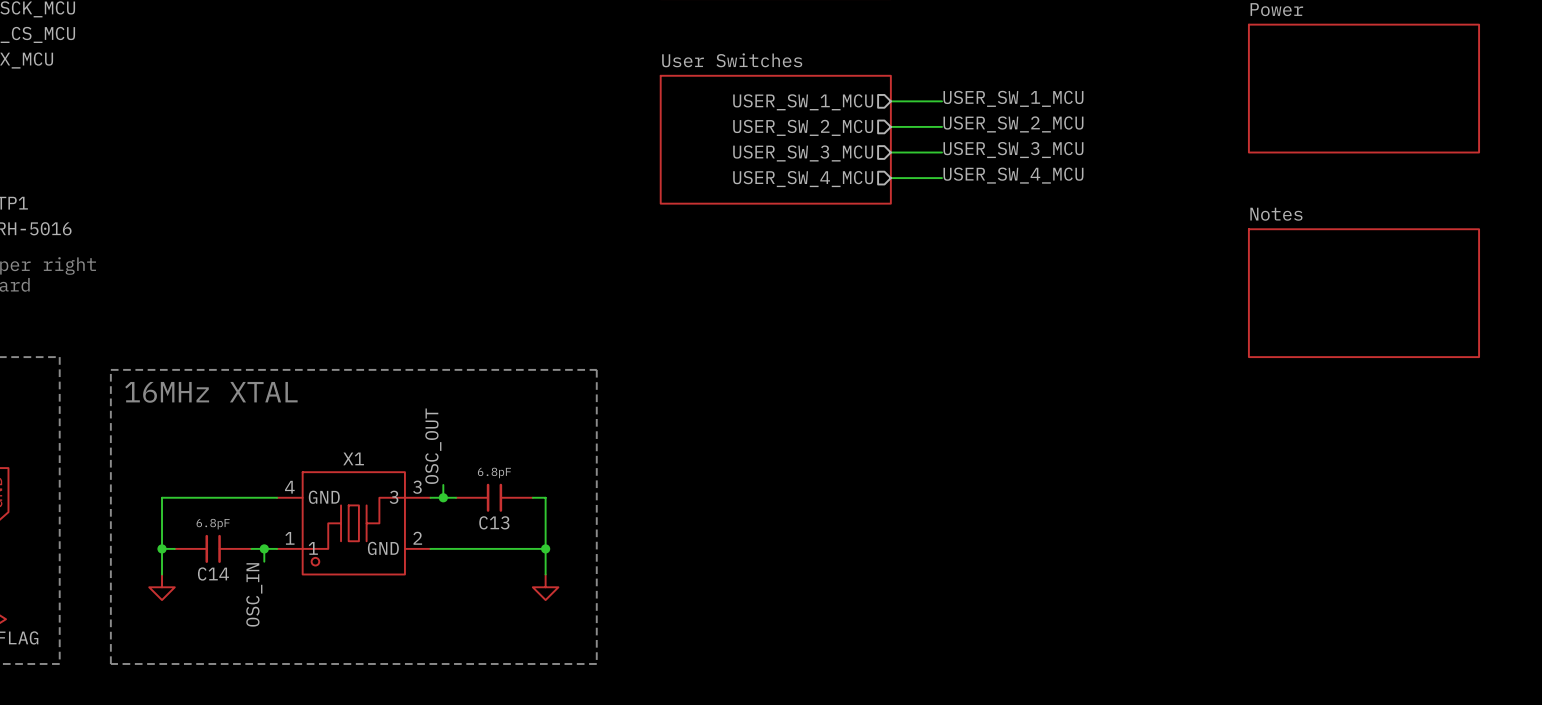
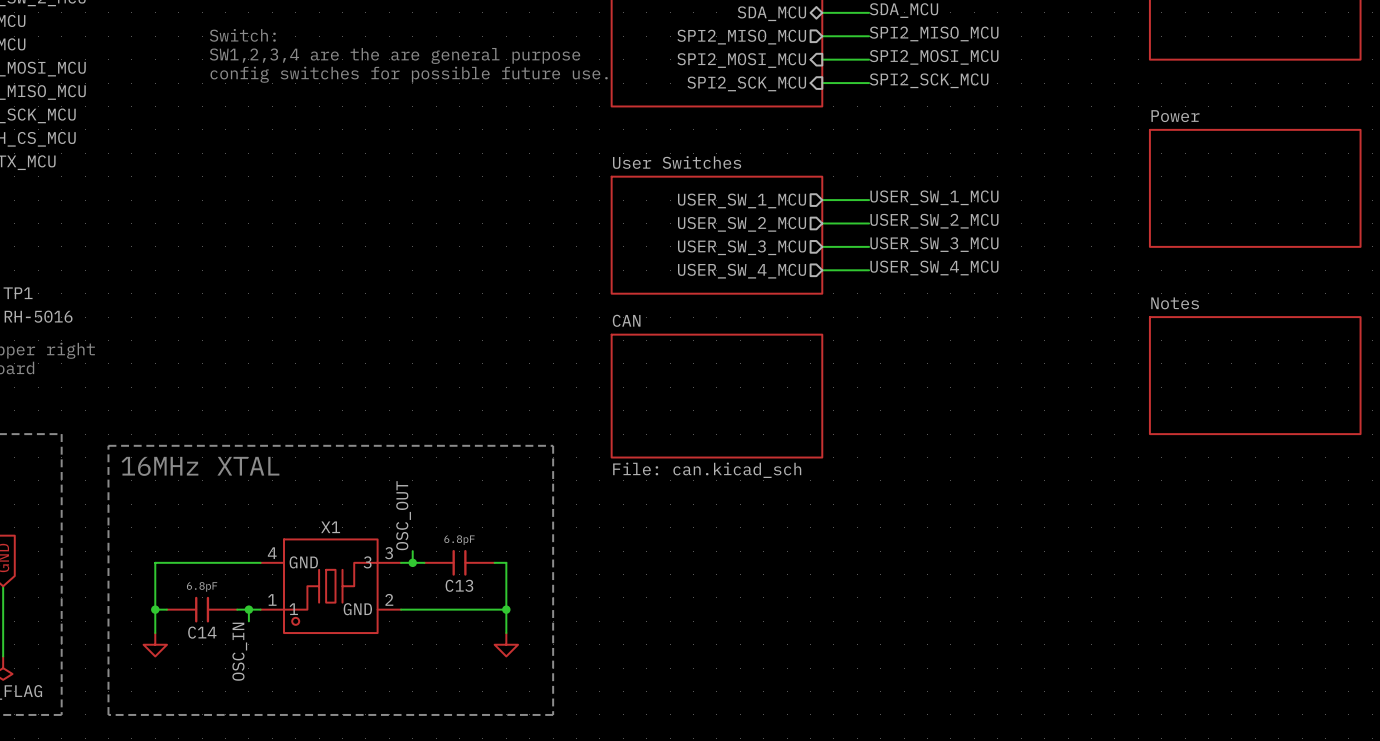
sheet CAN: none -> File: can.kicad_sch (716, 396)

